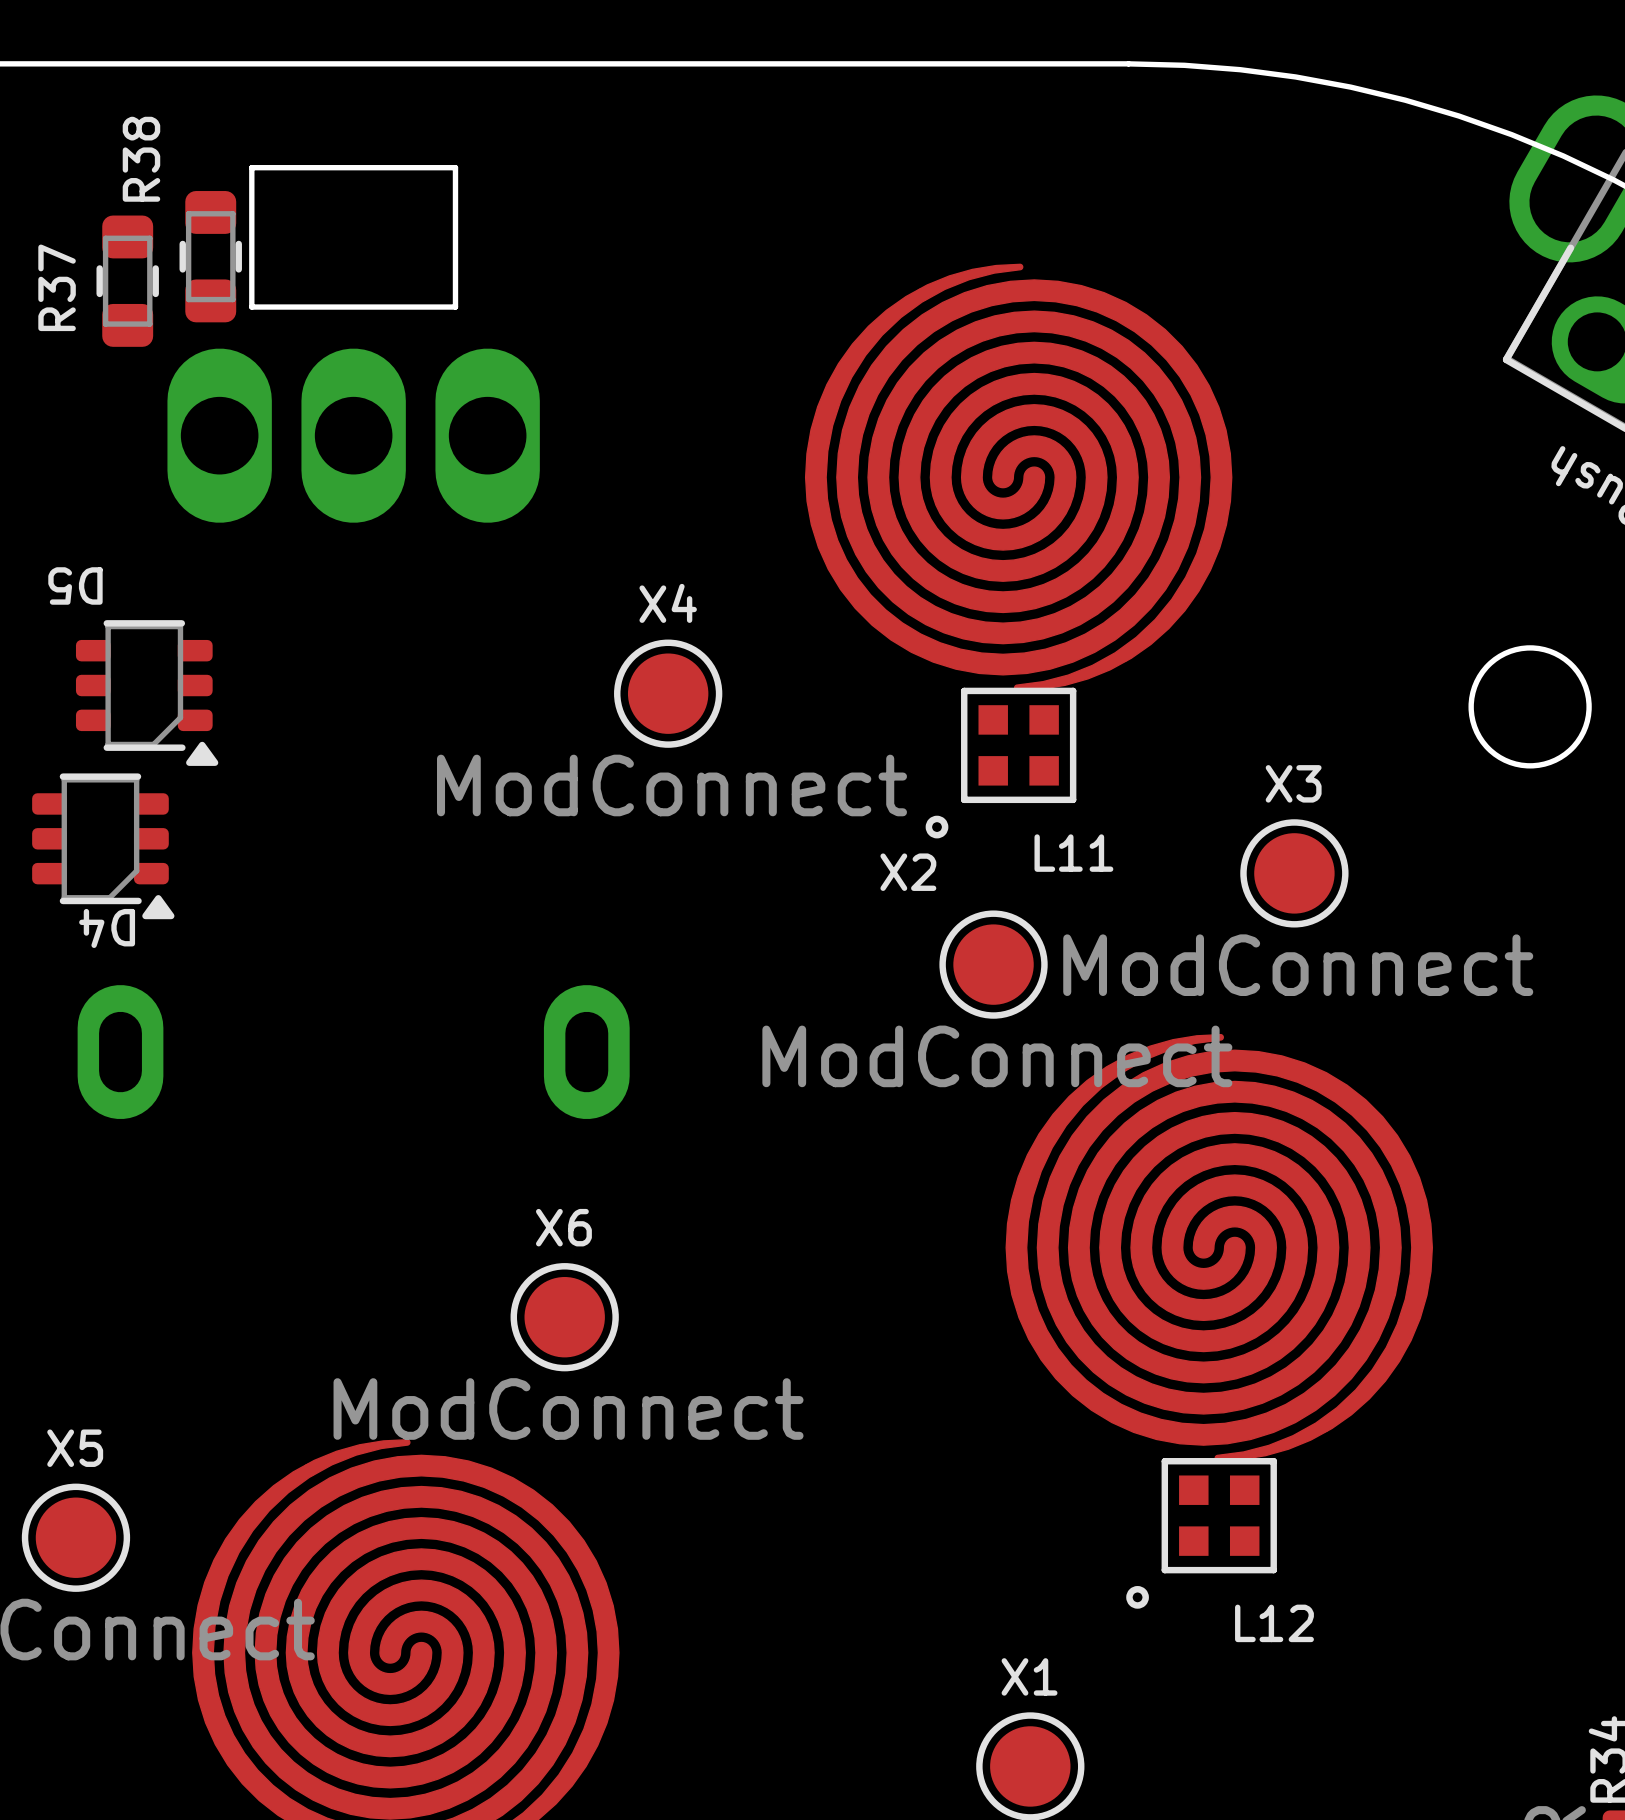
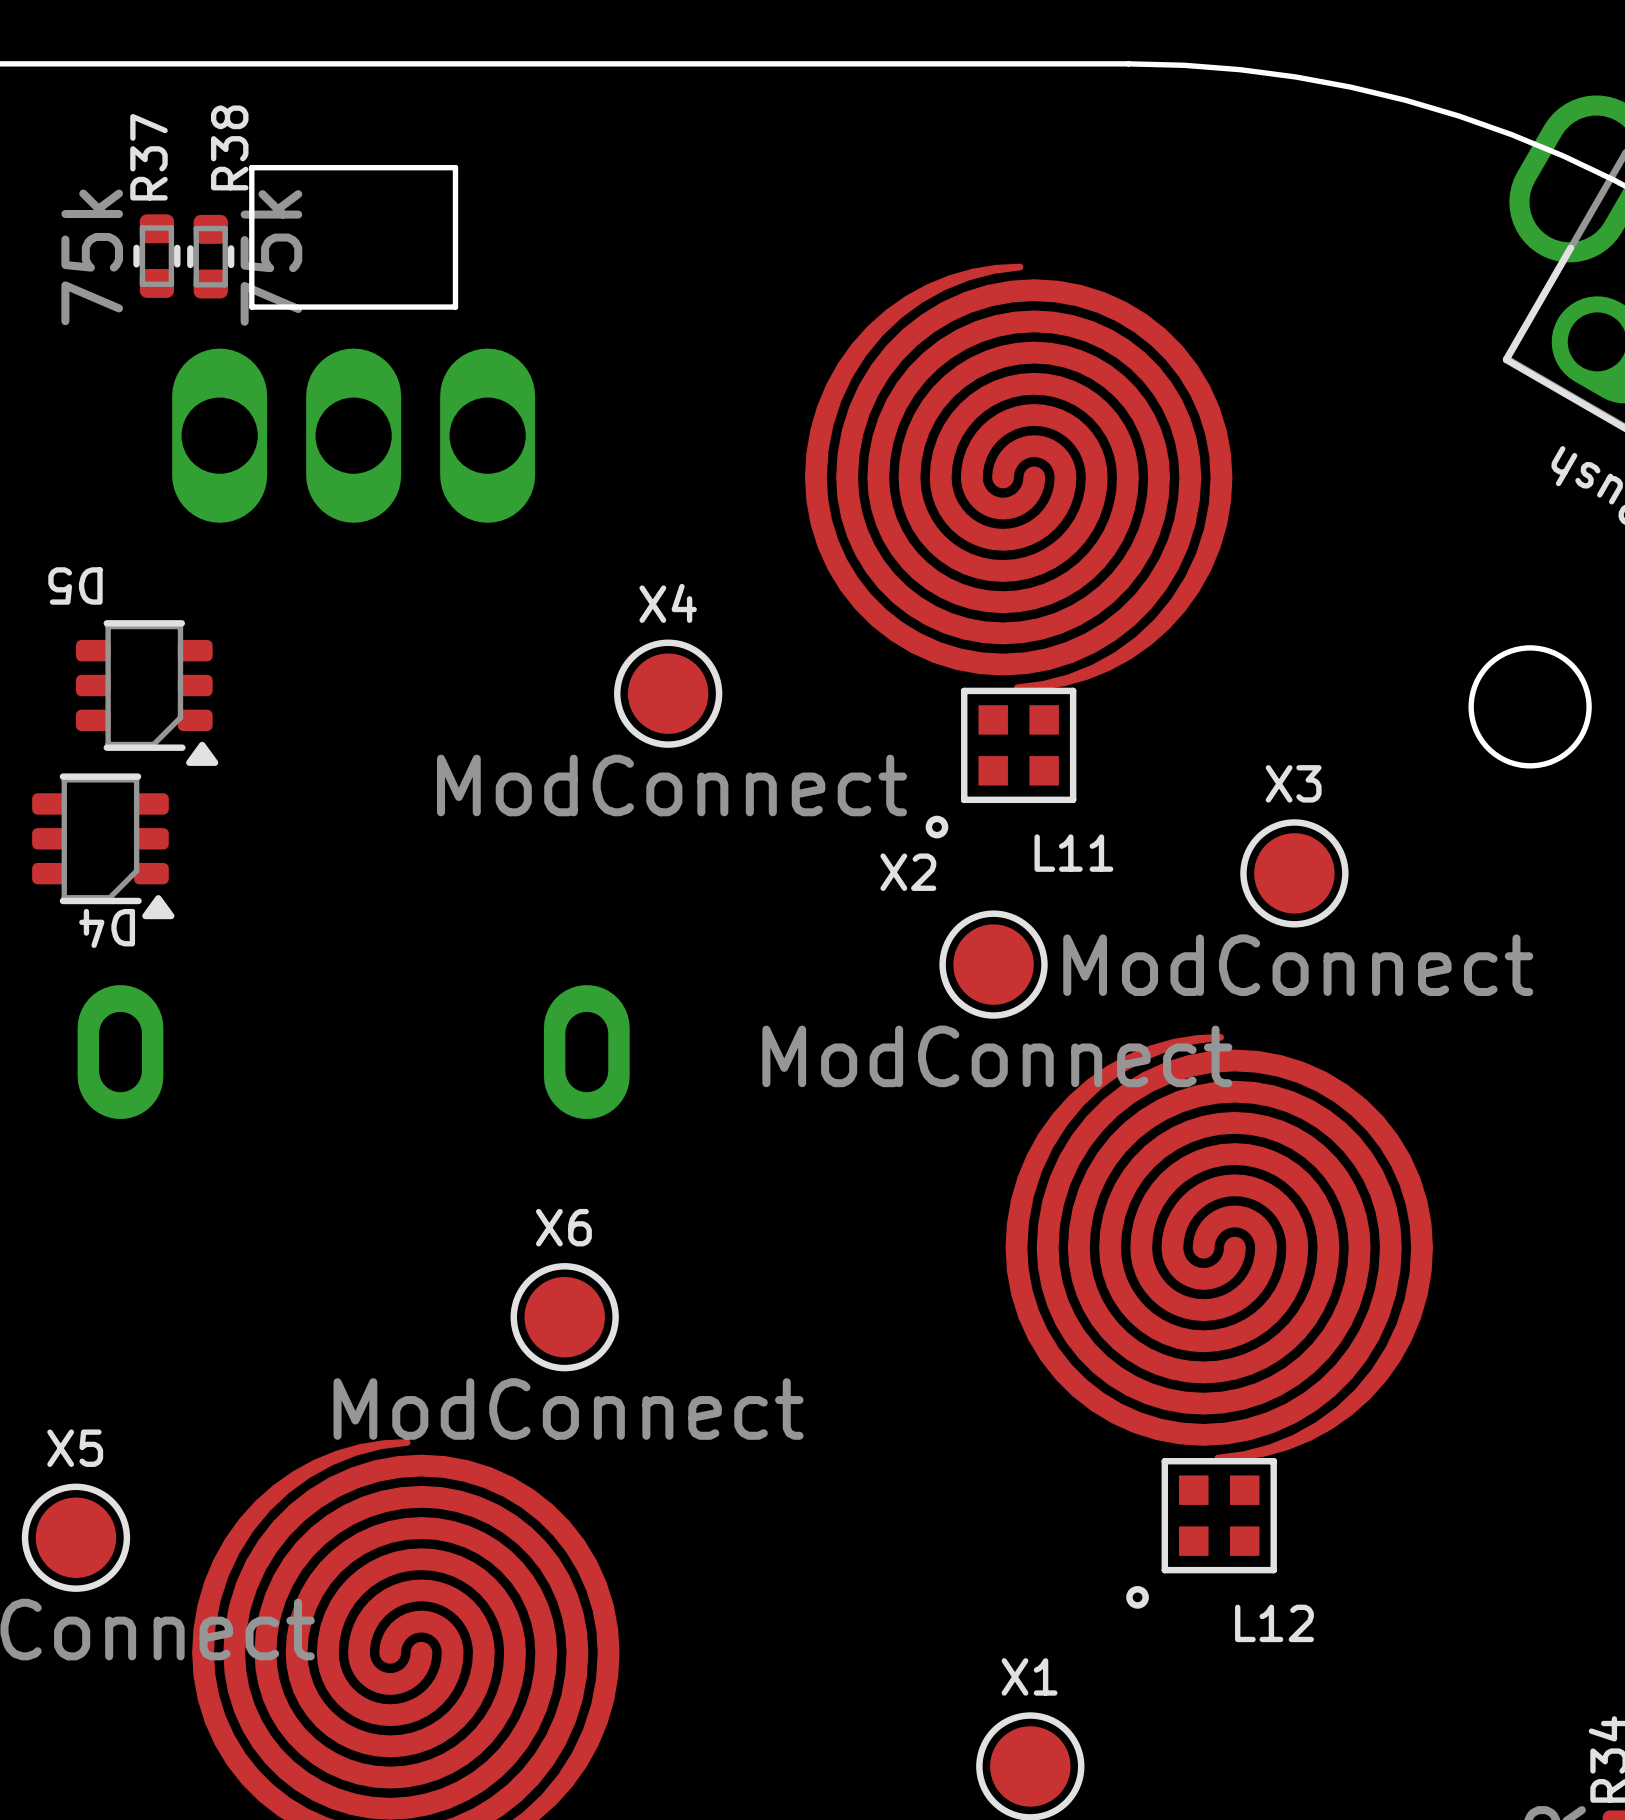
R38 name position: R38 (141, 159) -> R38 (229, 147)
R38 footprint: [179, 191, 242, 323] -> [187, 214, 235, 299]
R37 footprint: [96, 215, 159, 347] -> [133, 214, 181, 298]
R37 value: none -> 75k (92, 257)
R38 value: none -> 75k (271, 257)
R37 name position: R37 (57, 287) -> R37 (148, 157)
part footprint: [167, 348, 272, 523] -> [172, 348, 268, 523]
part footprint: [301, 348, 406, 523] -> [306, 348, 402, 523]
part footprint: [435, 348, 540, 523] -> [440, 348, 536, 523]

